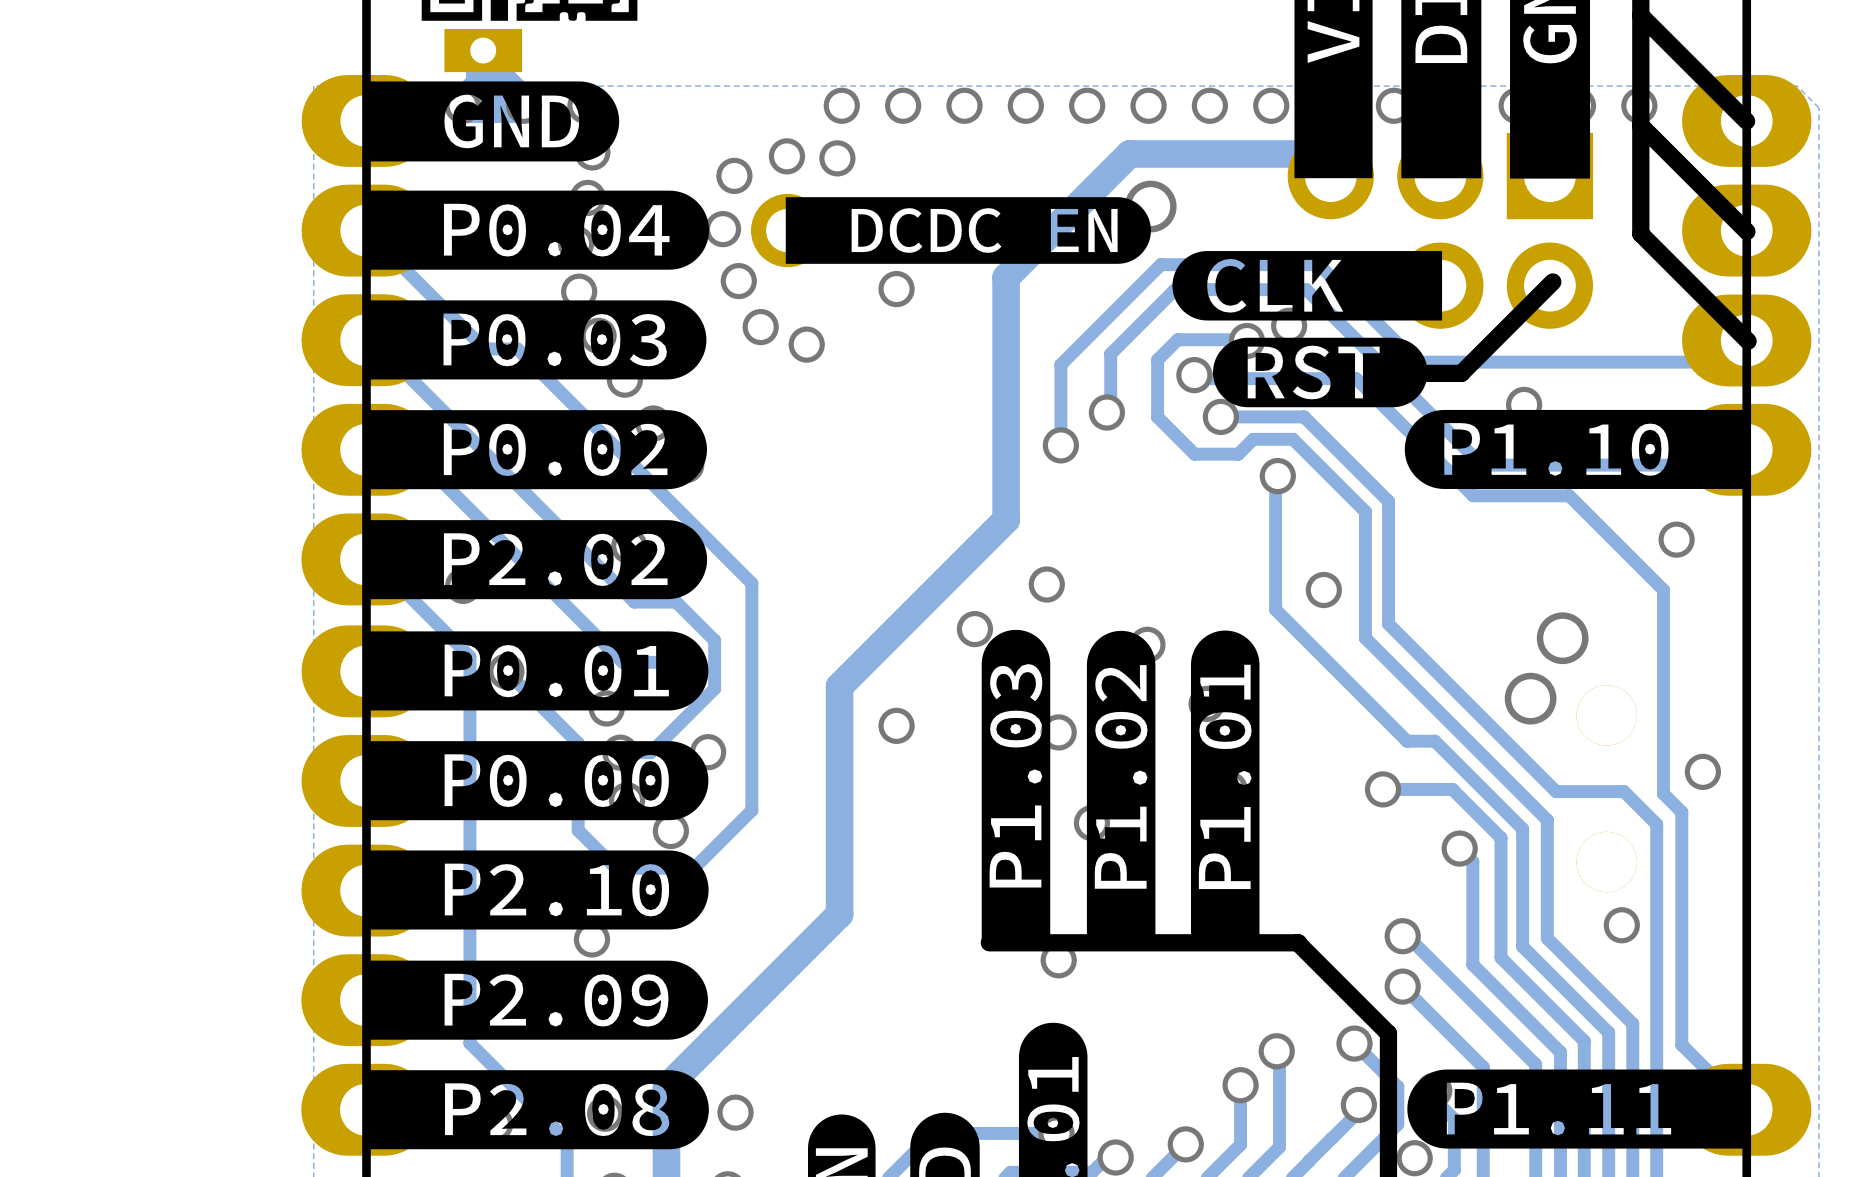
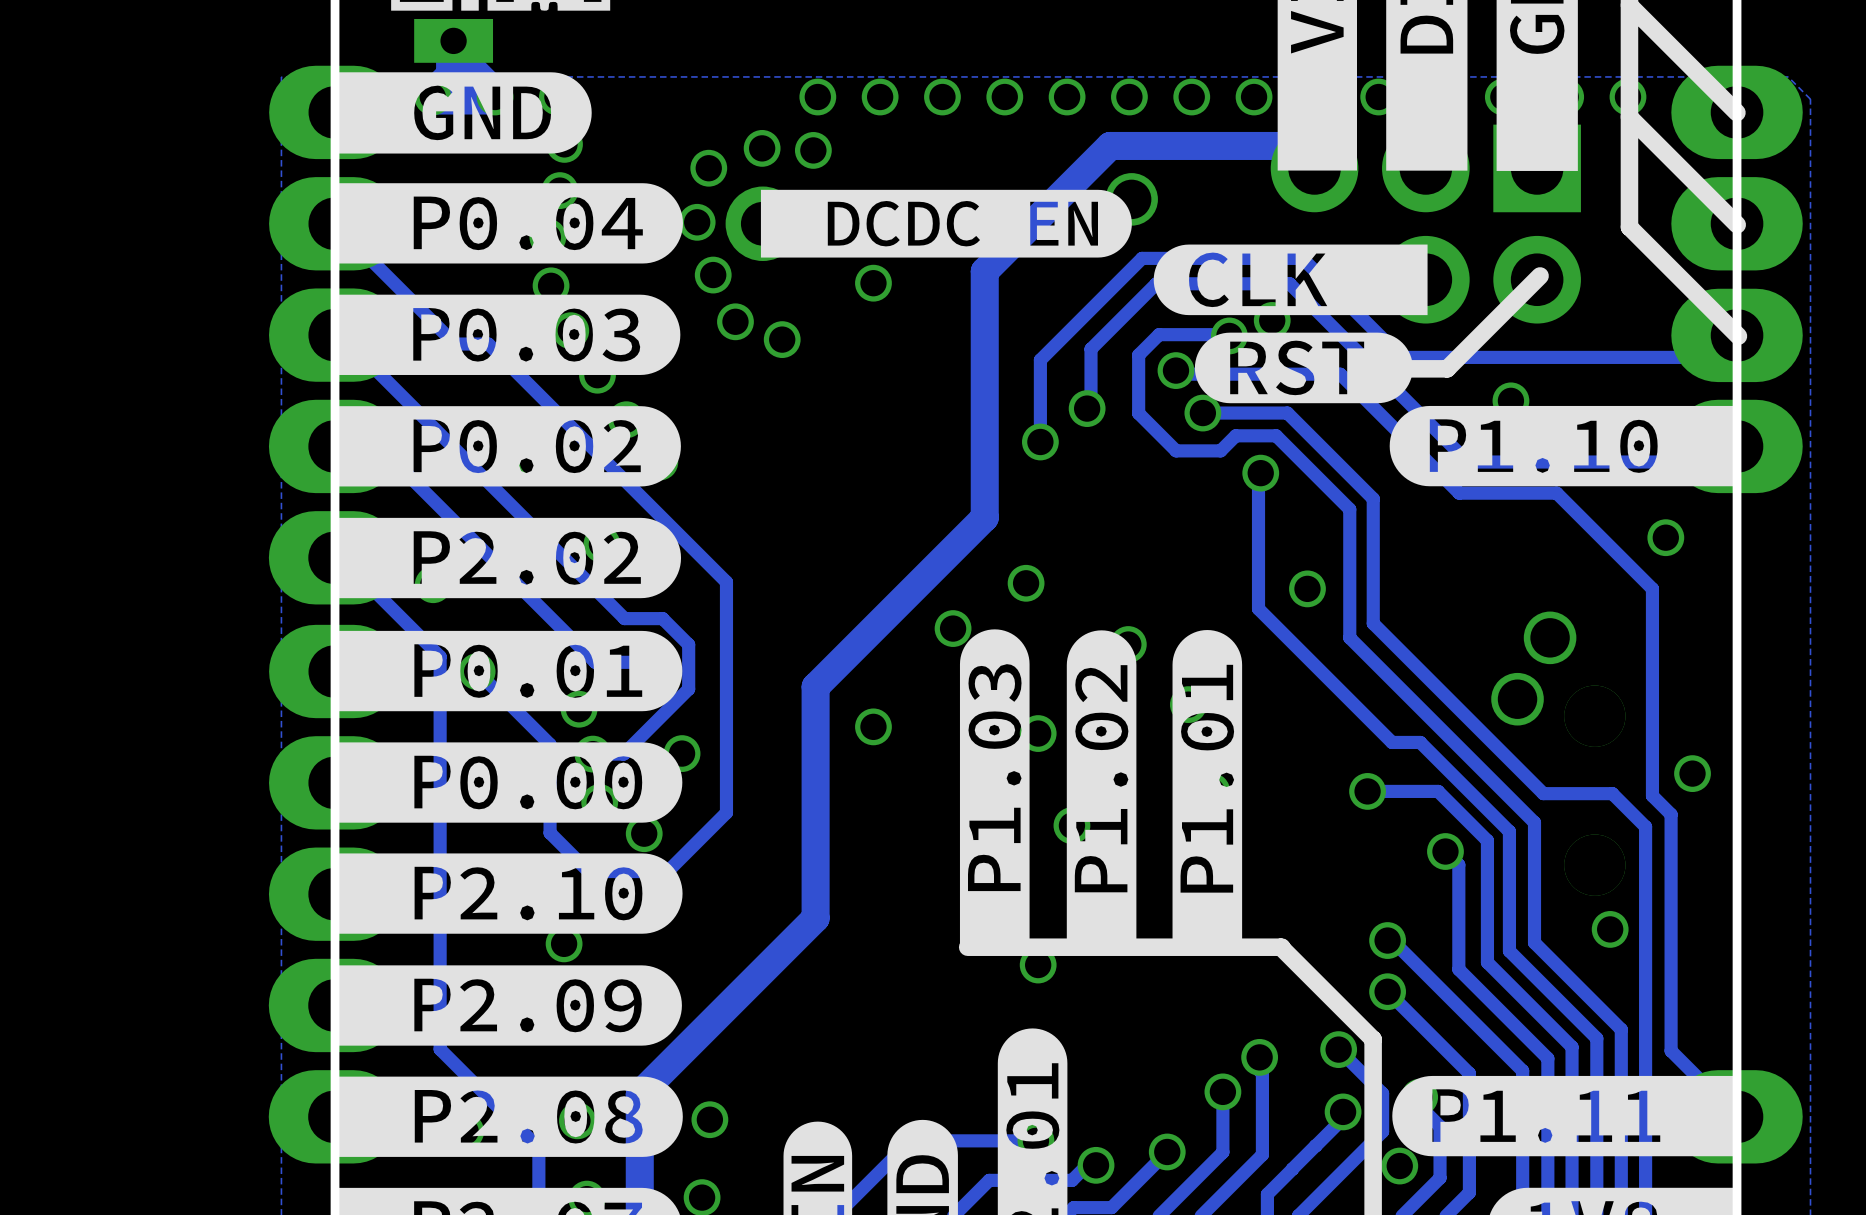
track: (634, 602) (676, 602) (714, 640) (714, 644) -> (607, 601) (624, 618) (662, 618) (688, 644)

